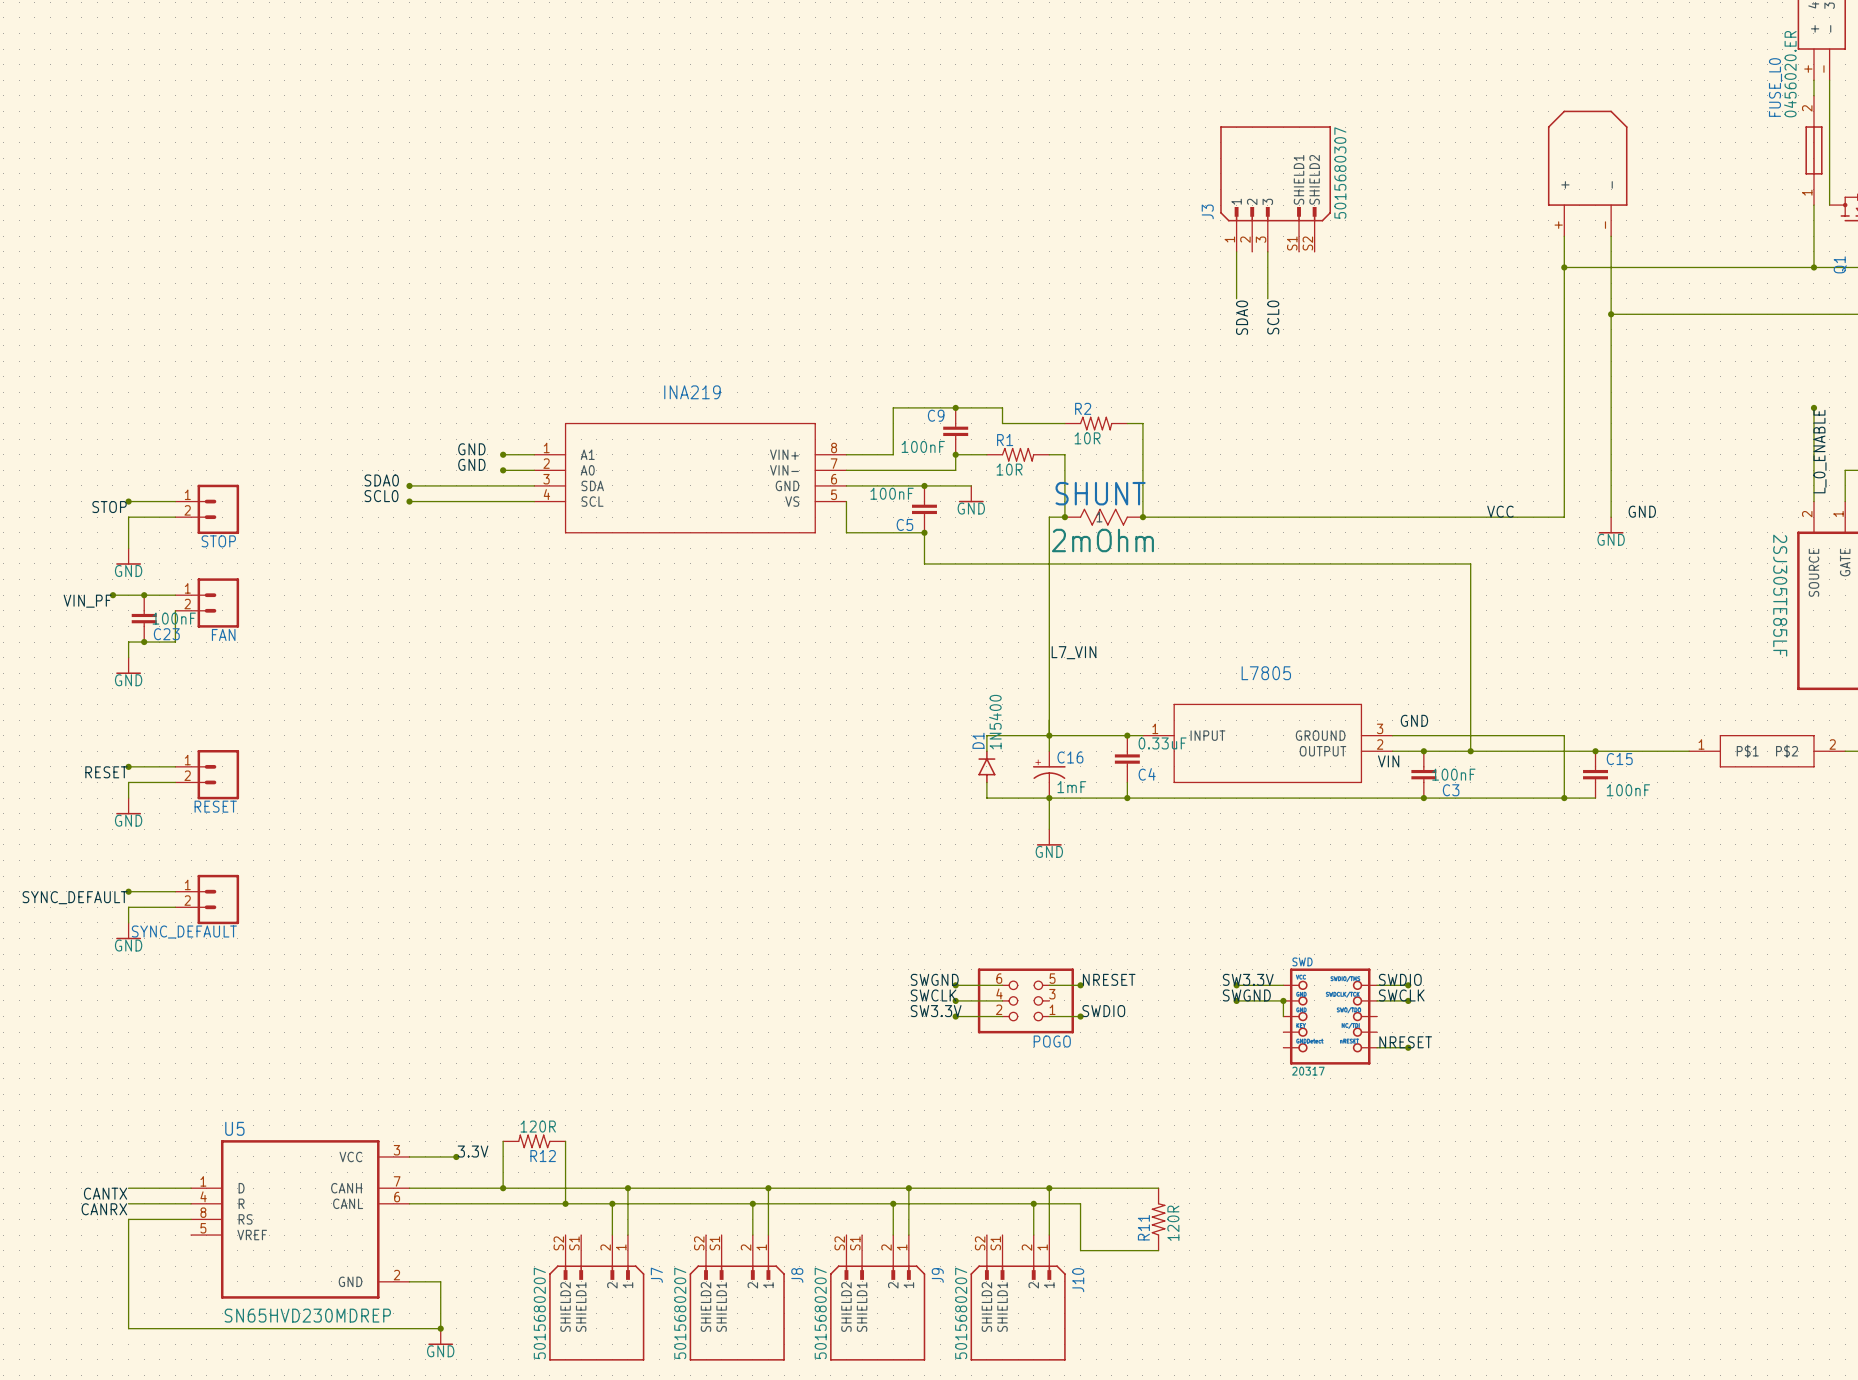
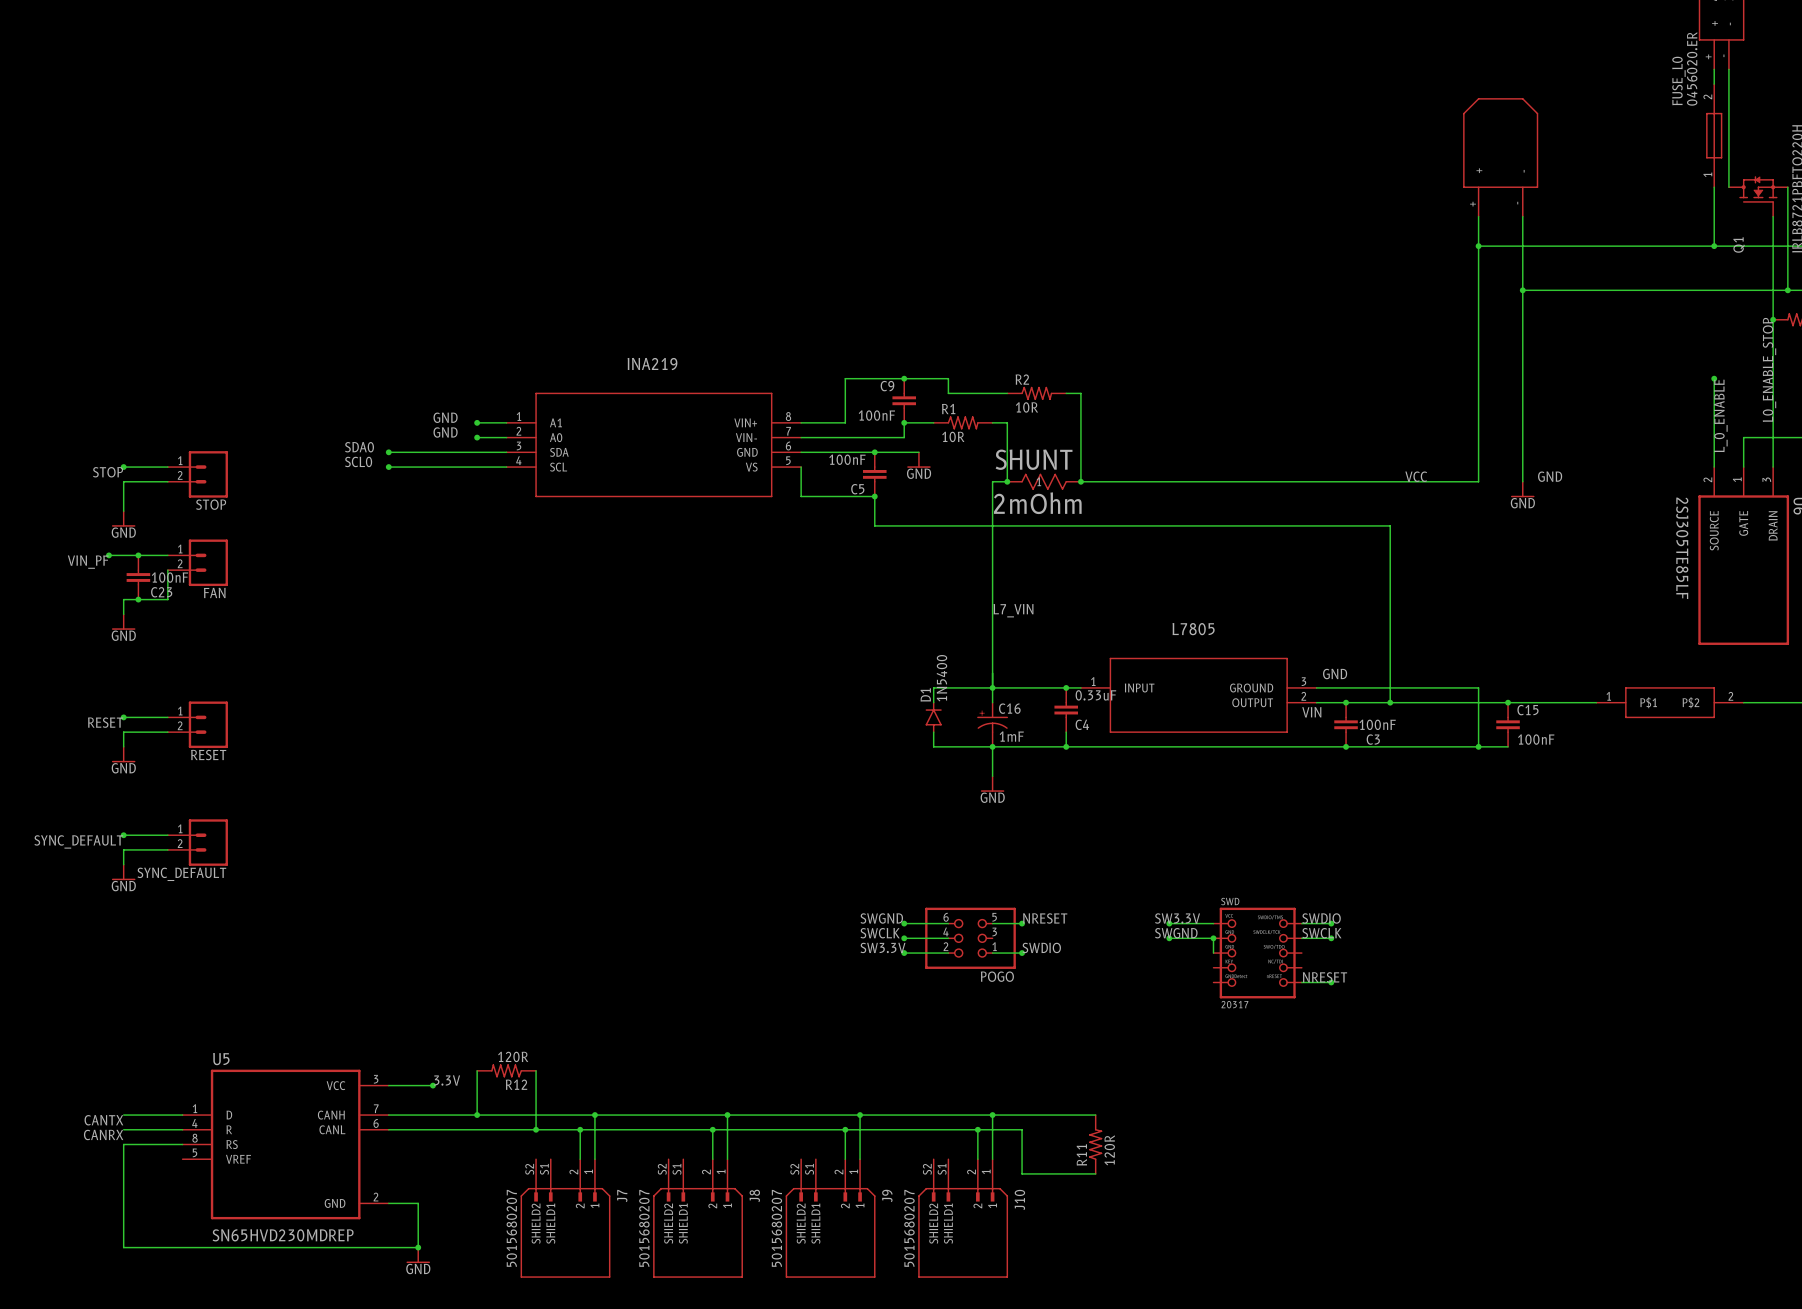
J3: 5015680307 (1275, 189) -> none
wire: (1236, 251) (1236, 298) -> none
wire: (1267, 251) (1267, 298) -> none
label: SDA0 (1242, 317) -> none
label: SCL0 (1273, 317) -> none

